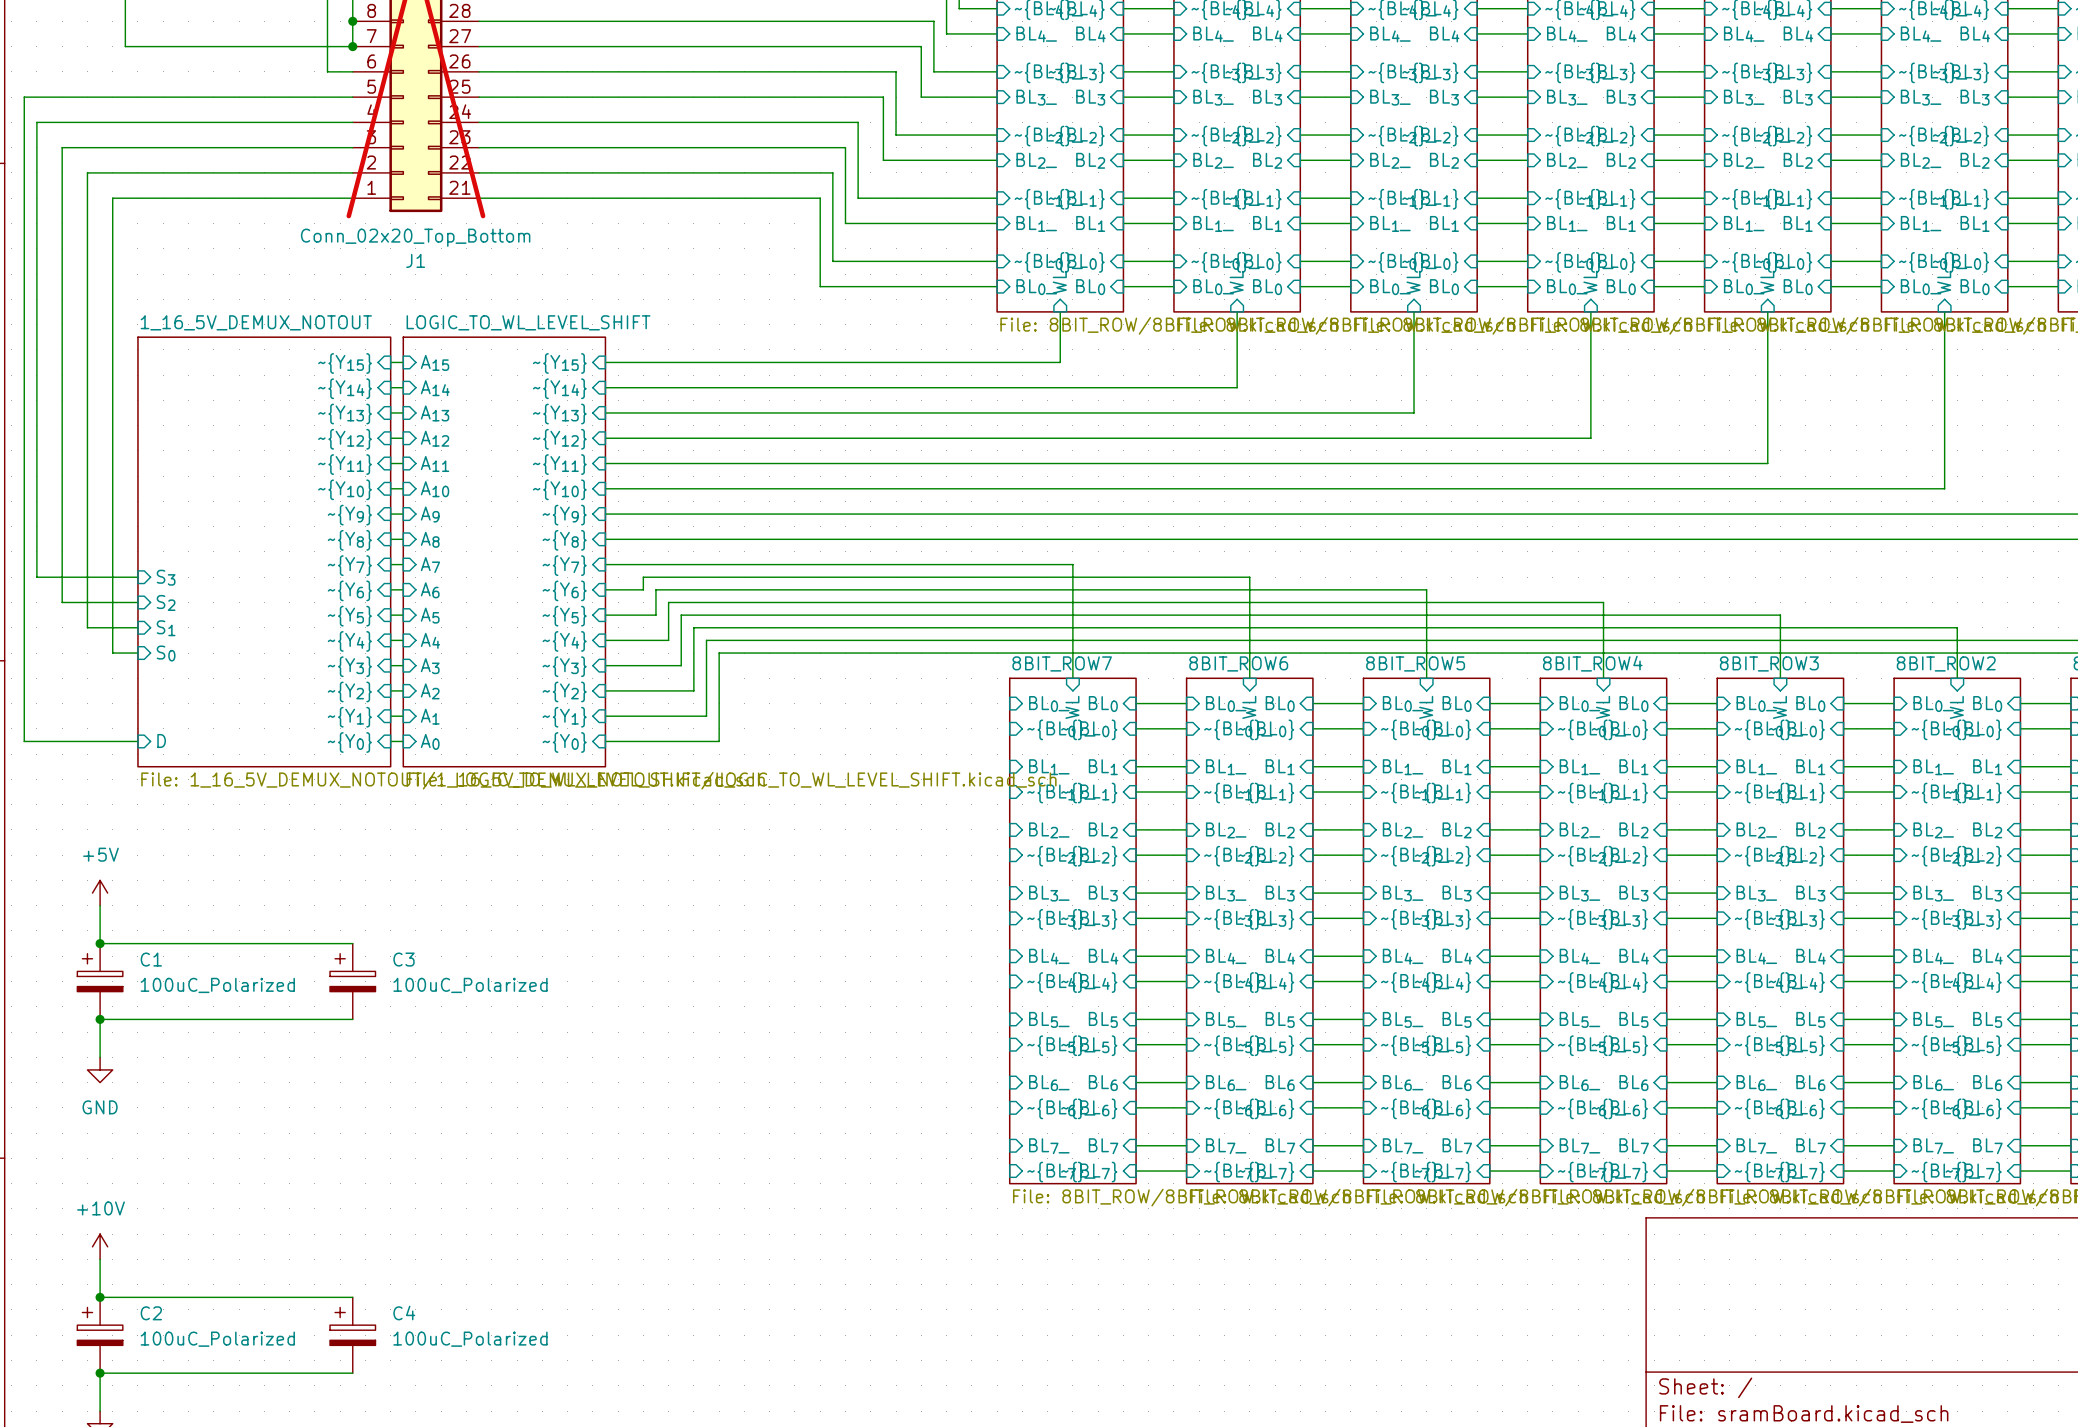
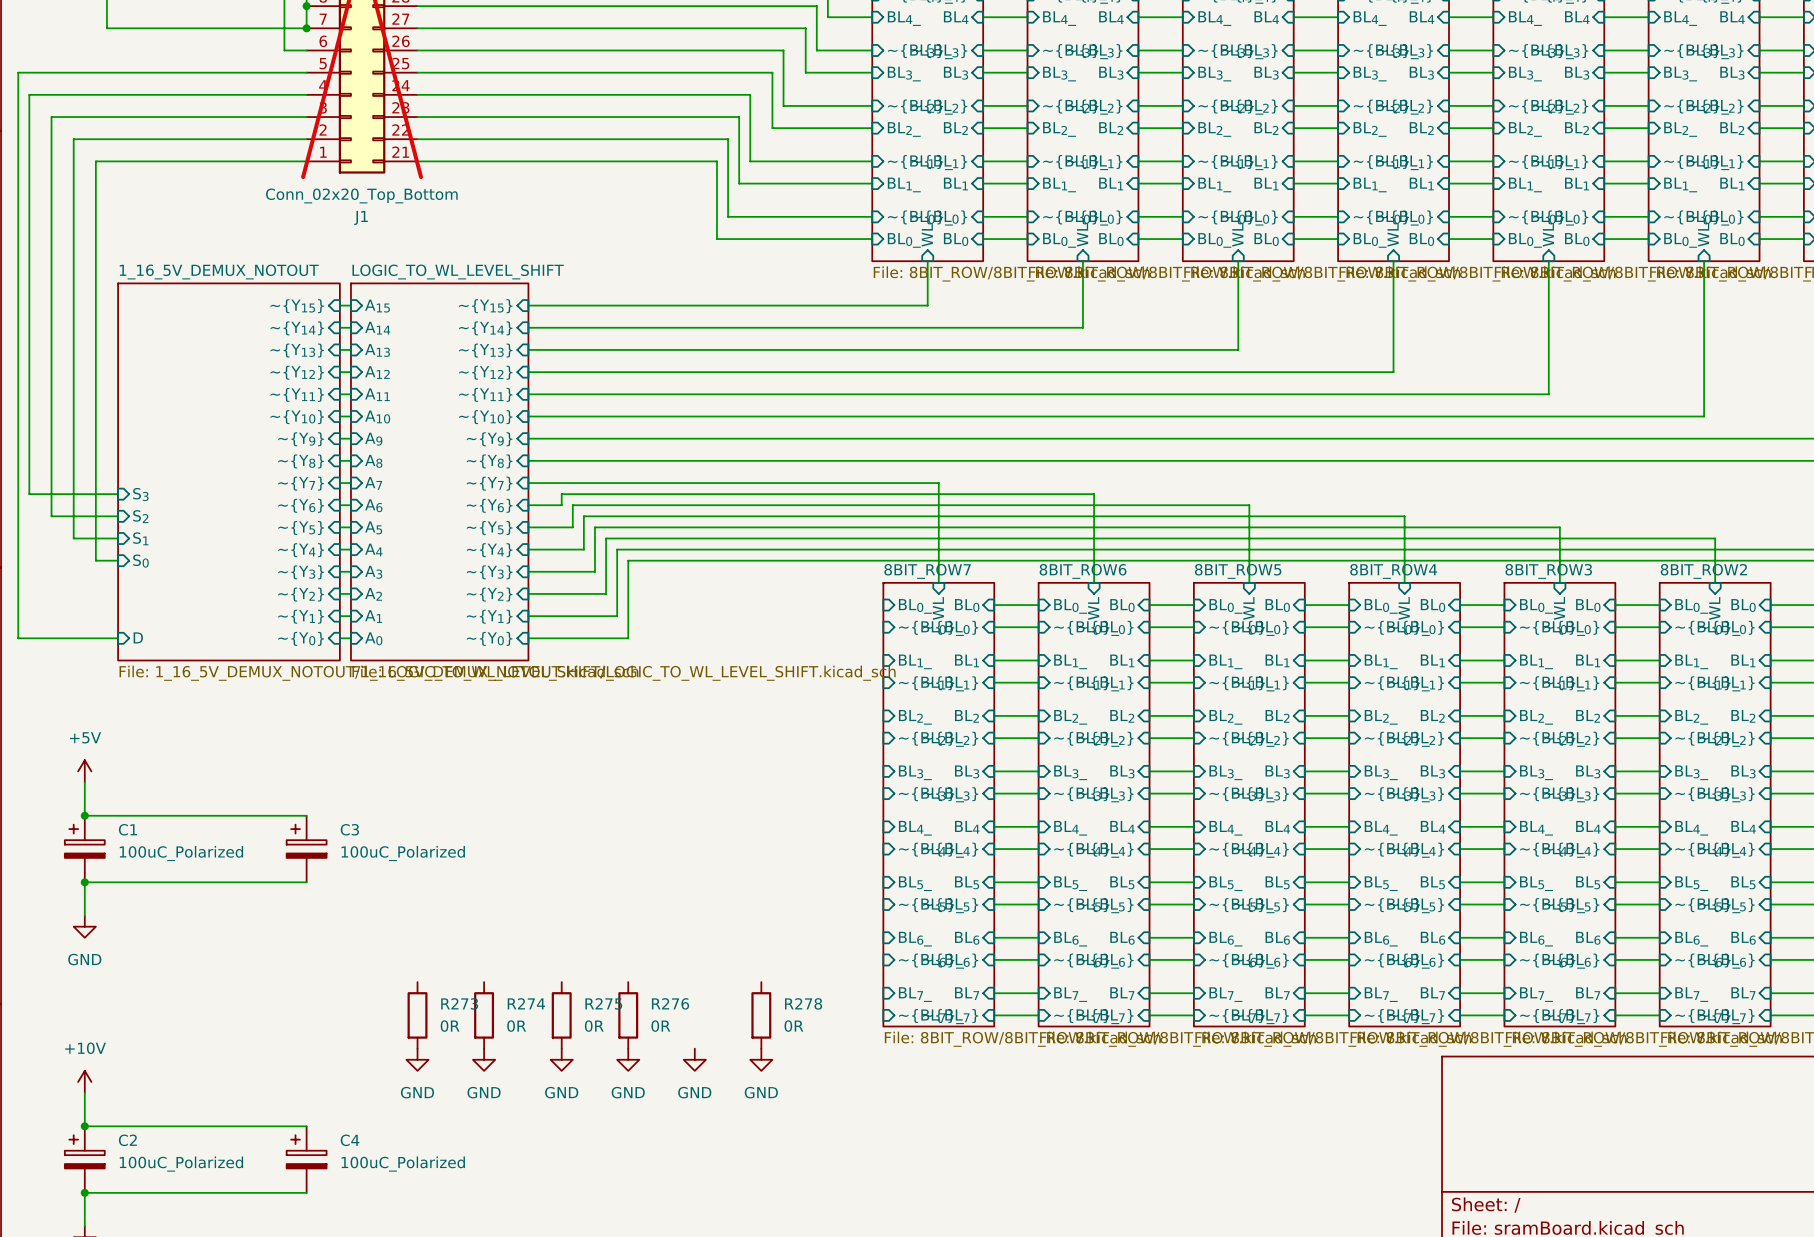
R273: none -> 0R (417, 1015)
R274: none -> 0R (484, 1015)
R275: none -> 0R (561, 1015)
R276: none -> 0R (628, 1015)
R278: none -> 0R (761, 1015)
power symbol: none -> GND (417, 1059)
power symbol: none -> GND (484, 1059)
power symbol: none -> GND (561, 1059)
power symbol: none -> GND (628, 1059)
power symbol: none -> GND (694, 1059)
power symbol: none -> GND (761, 1059)

